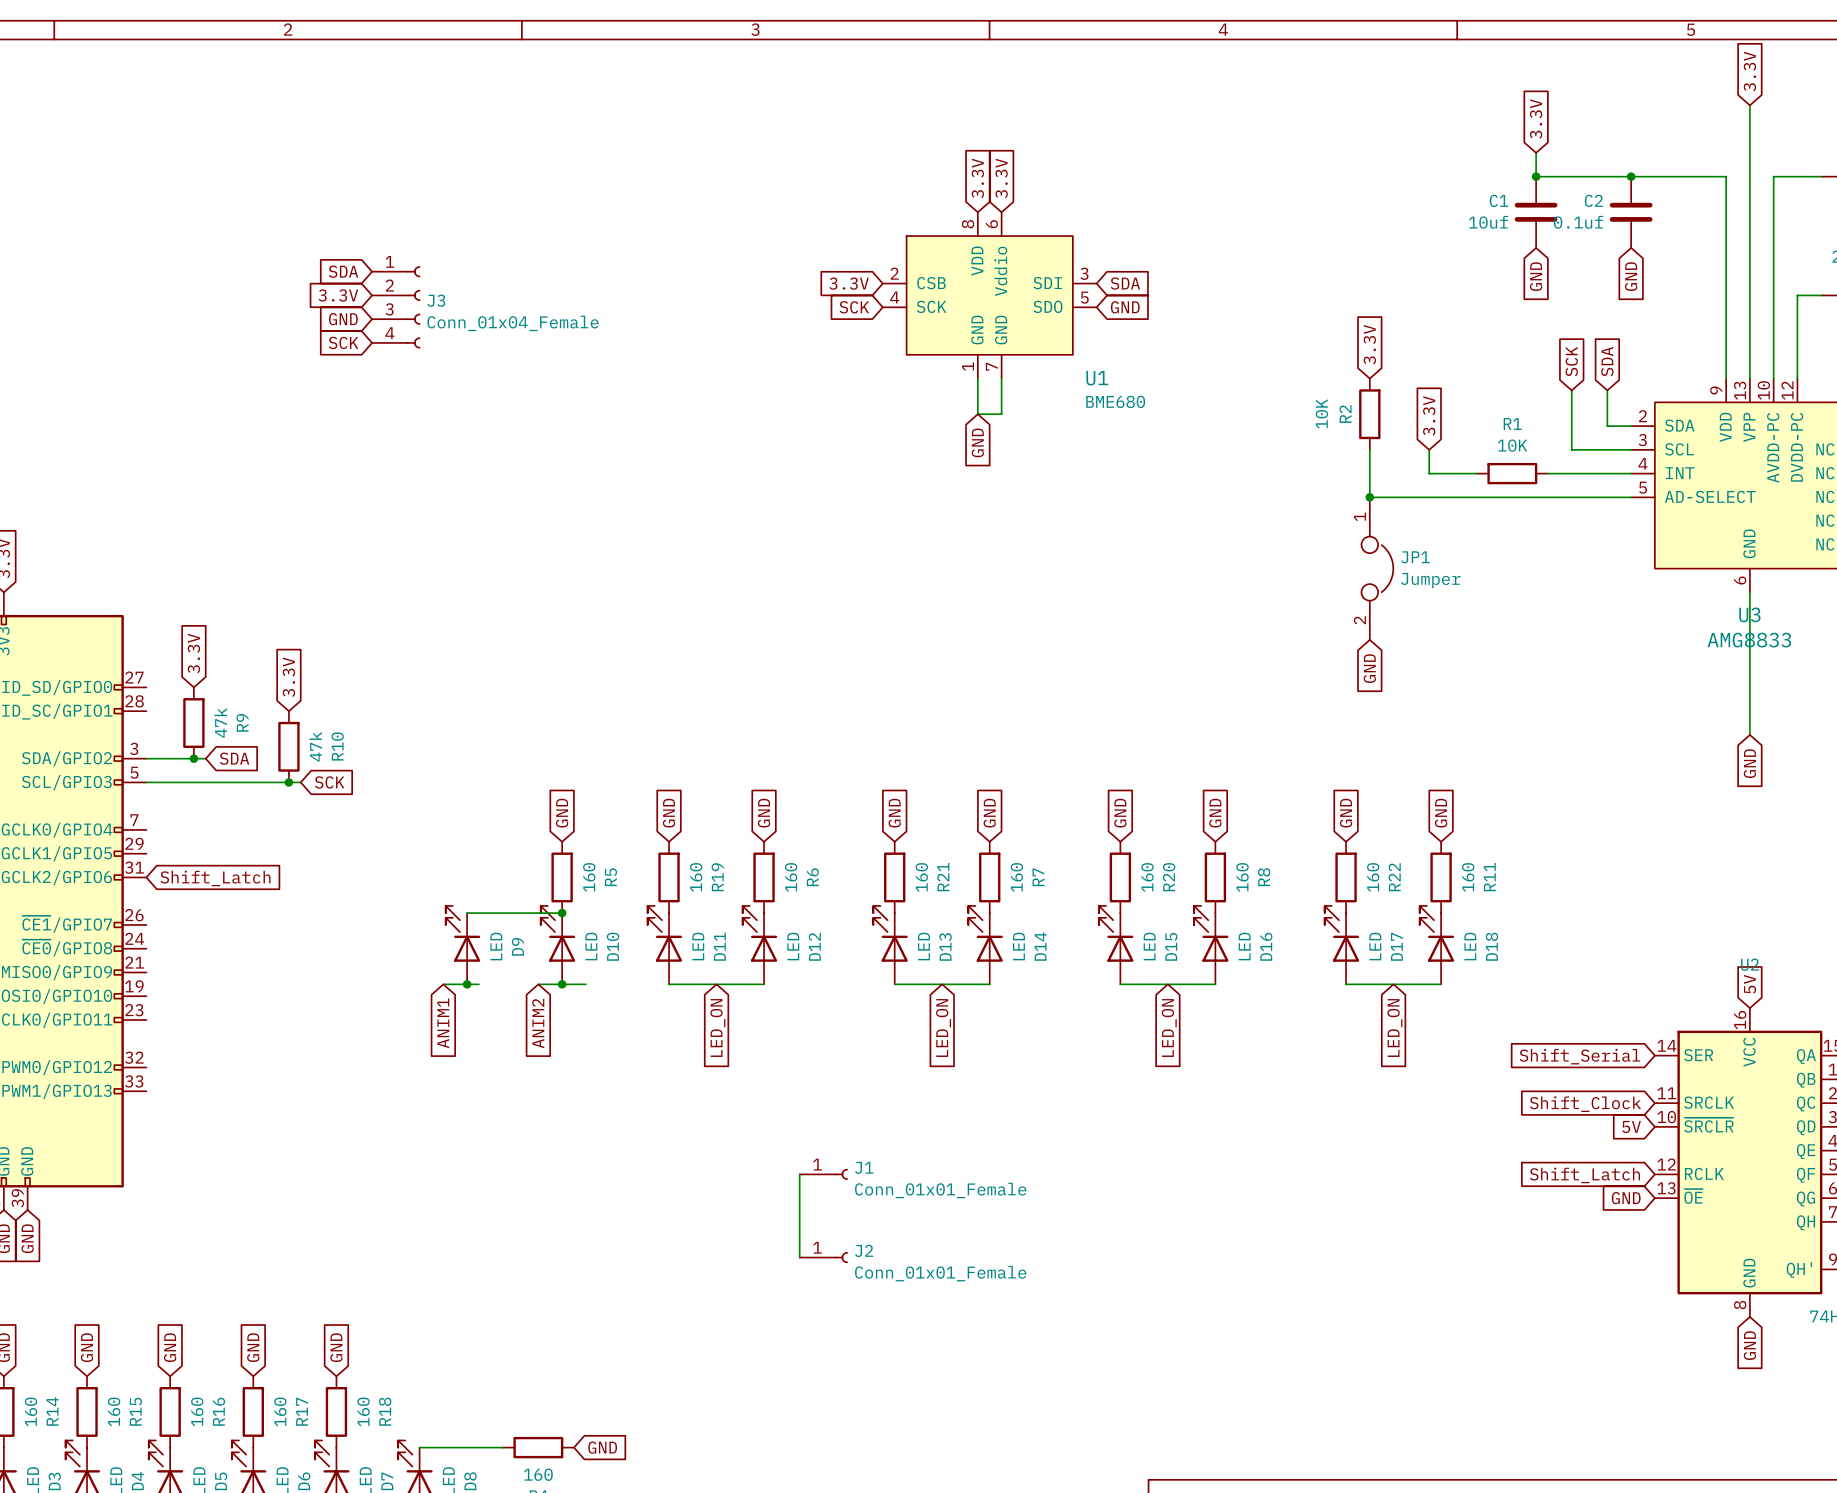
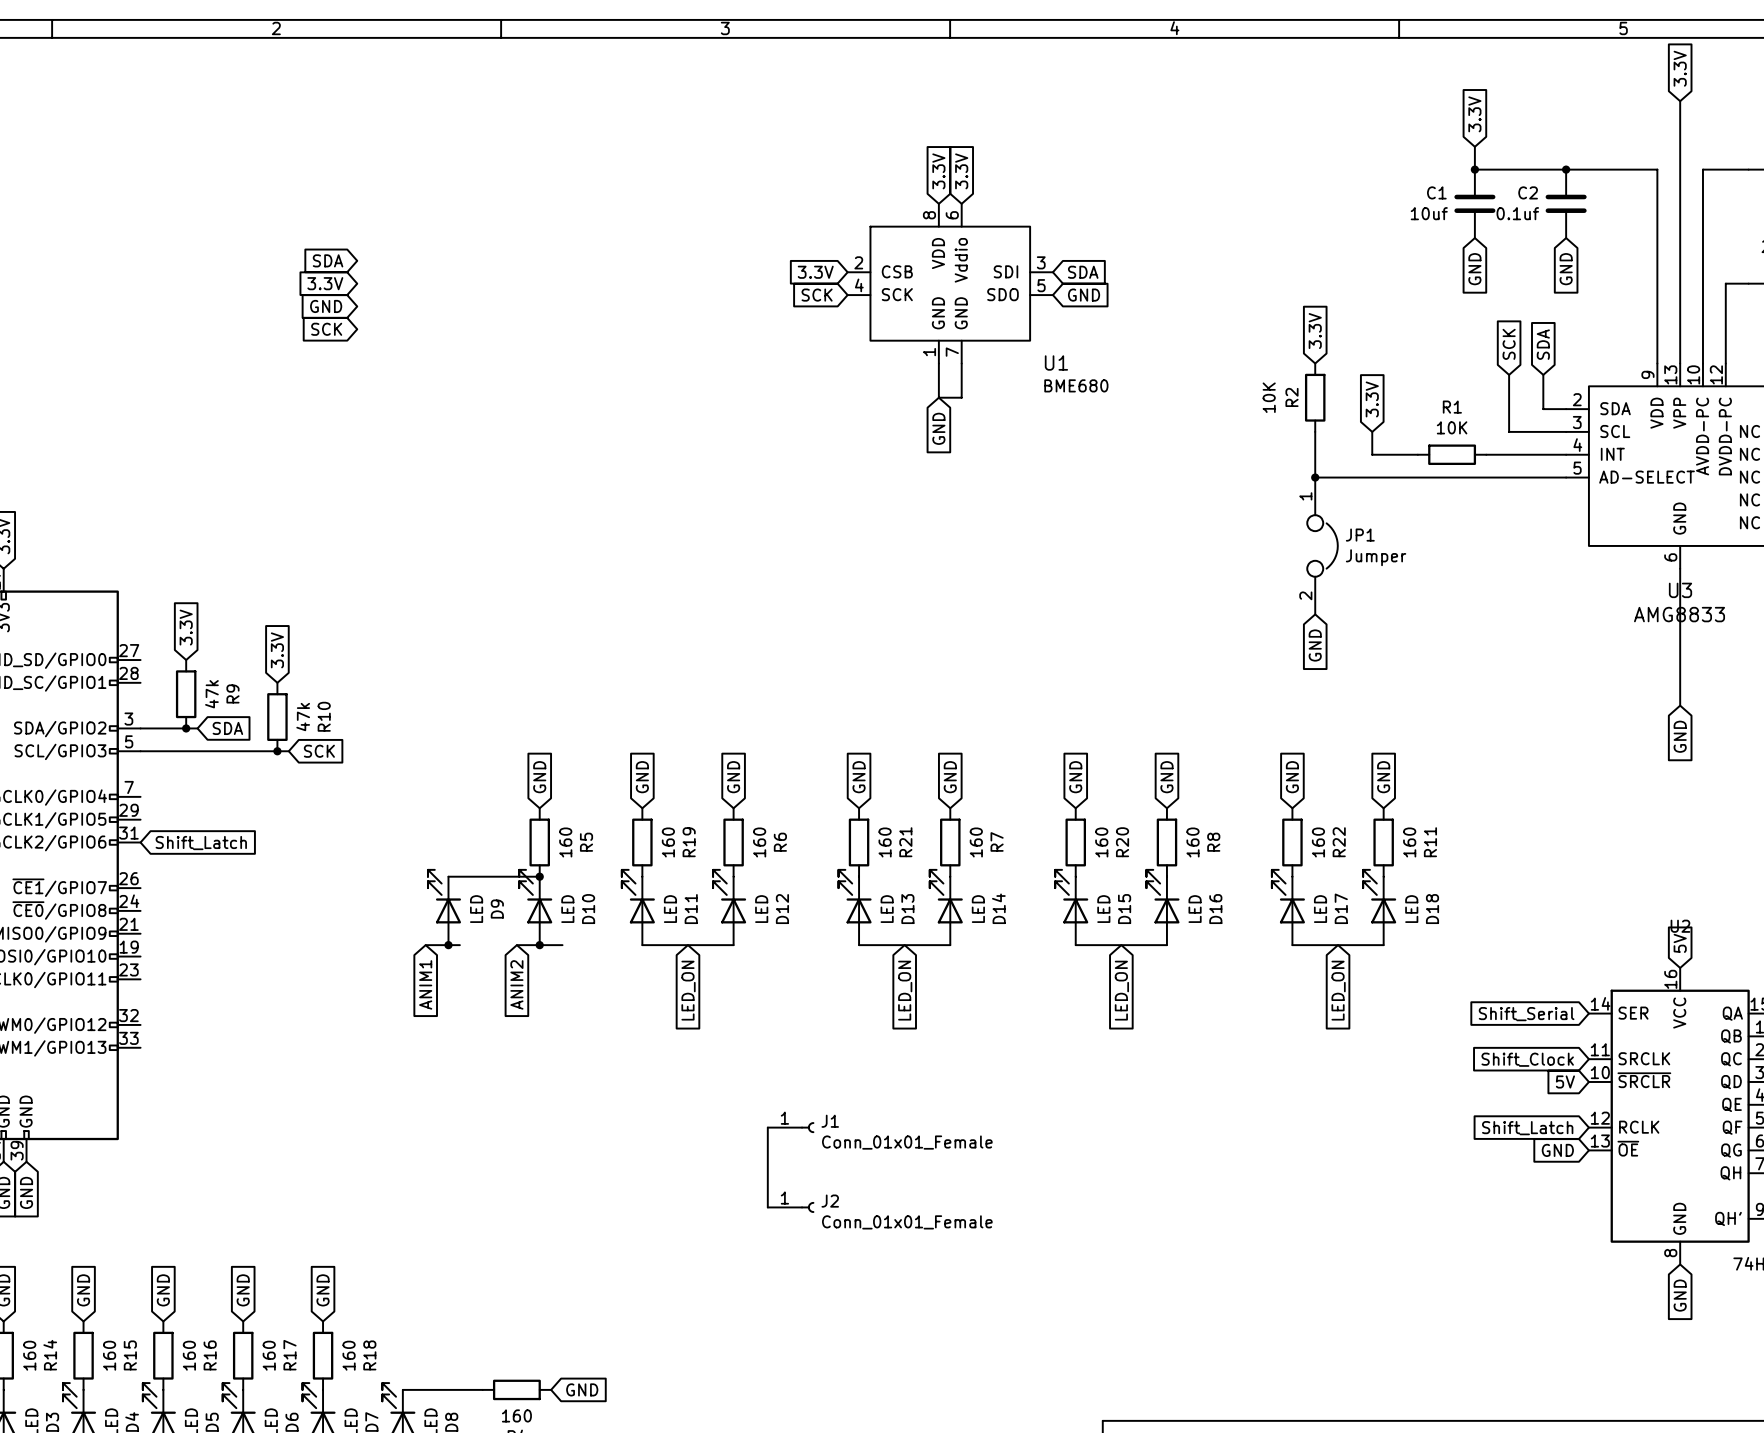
J3: Conn_01x04_Female (396, 307) -> none

